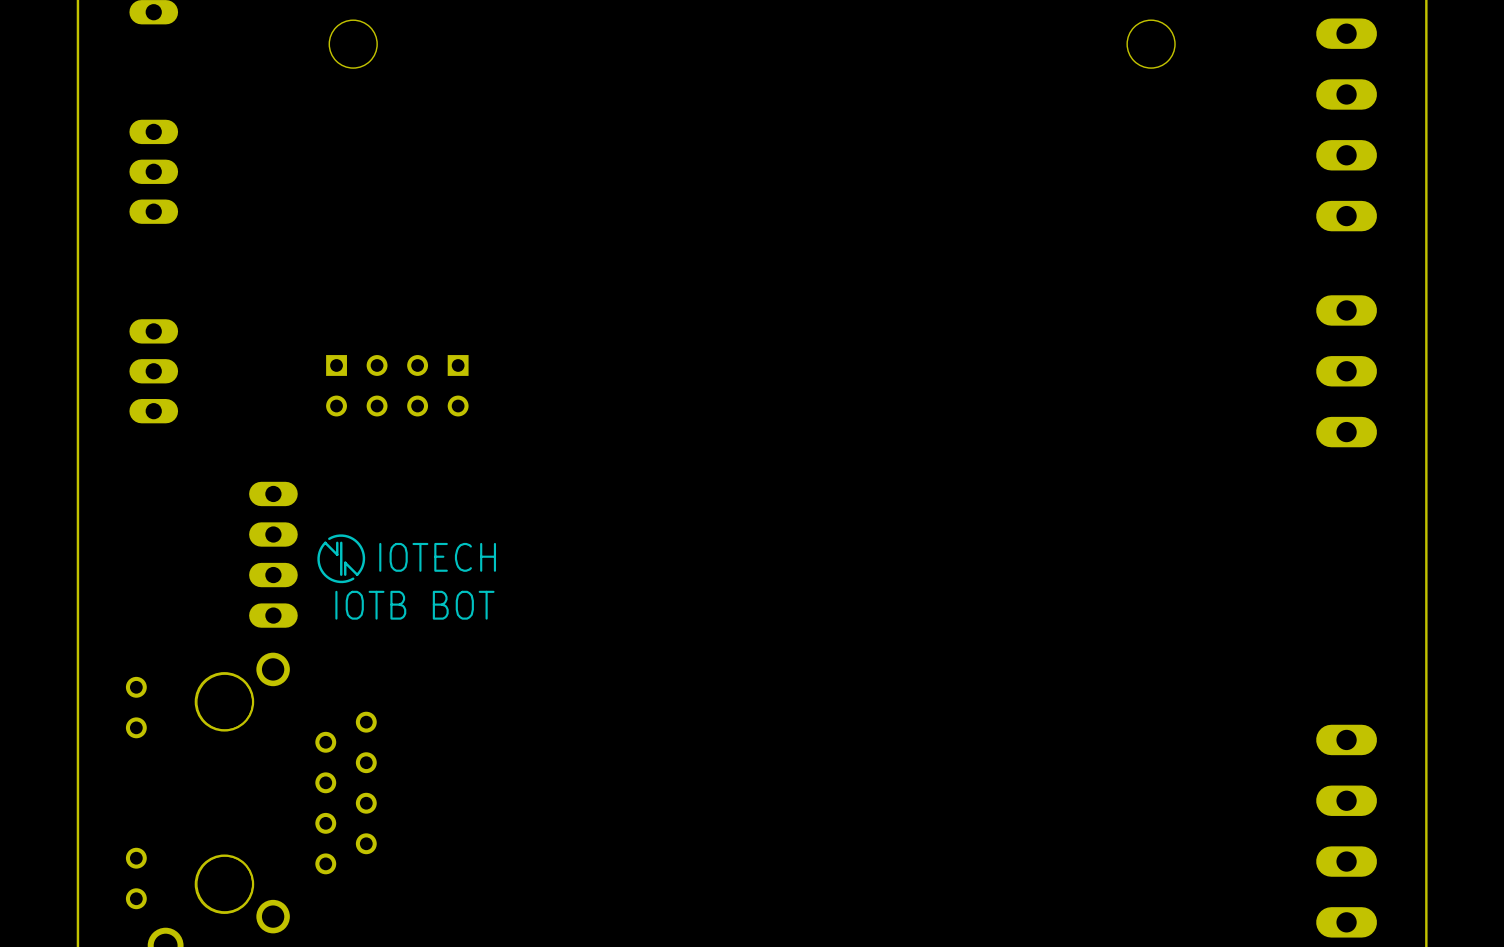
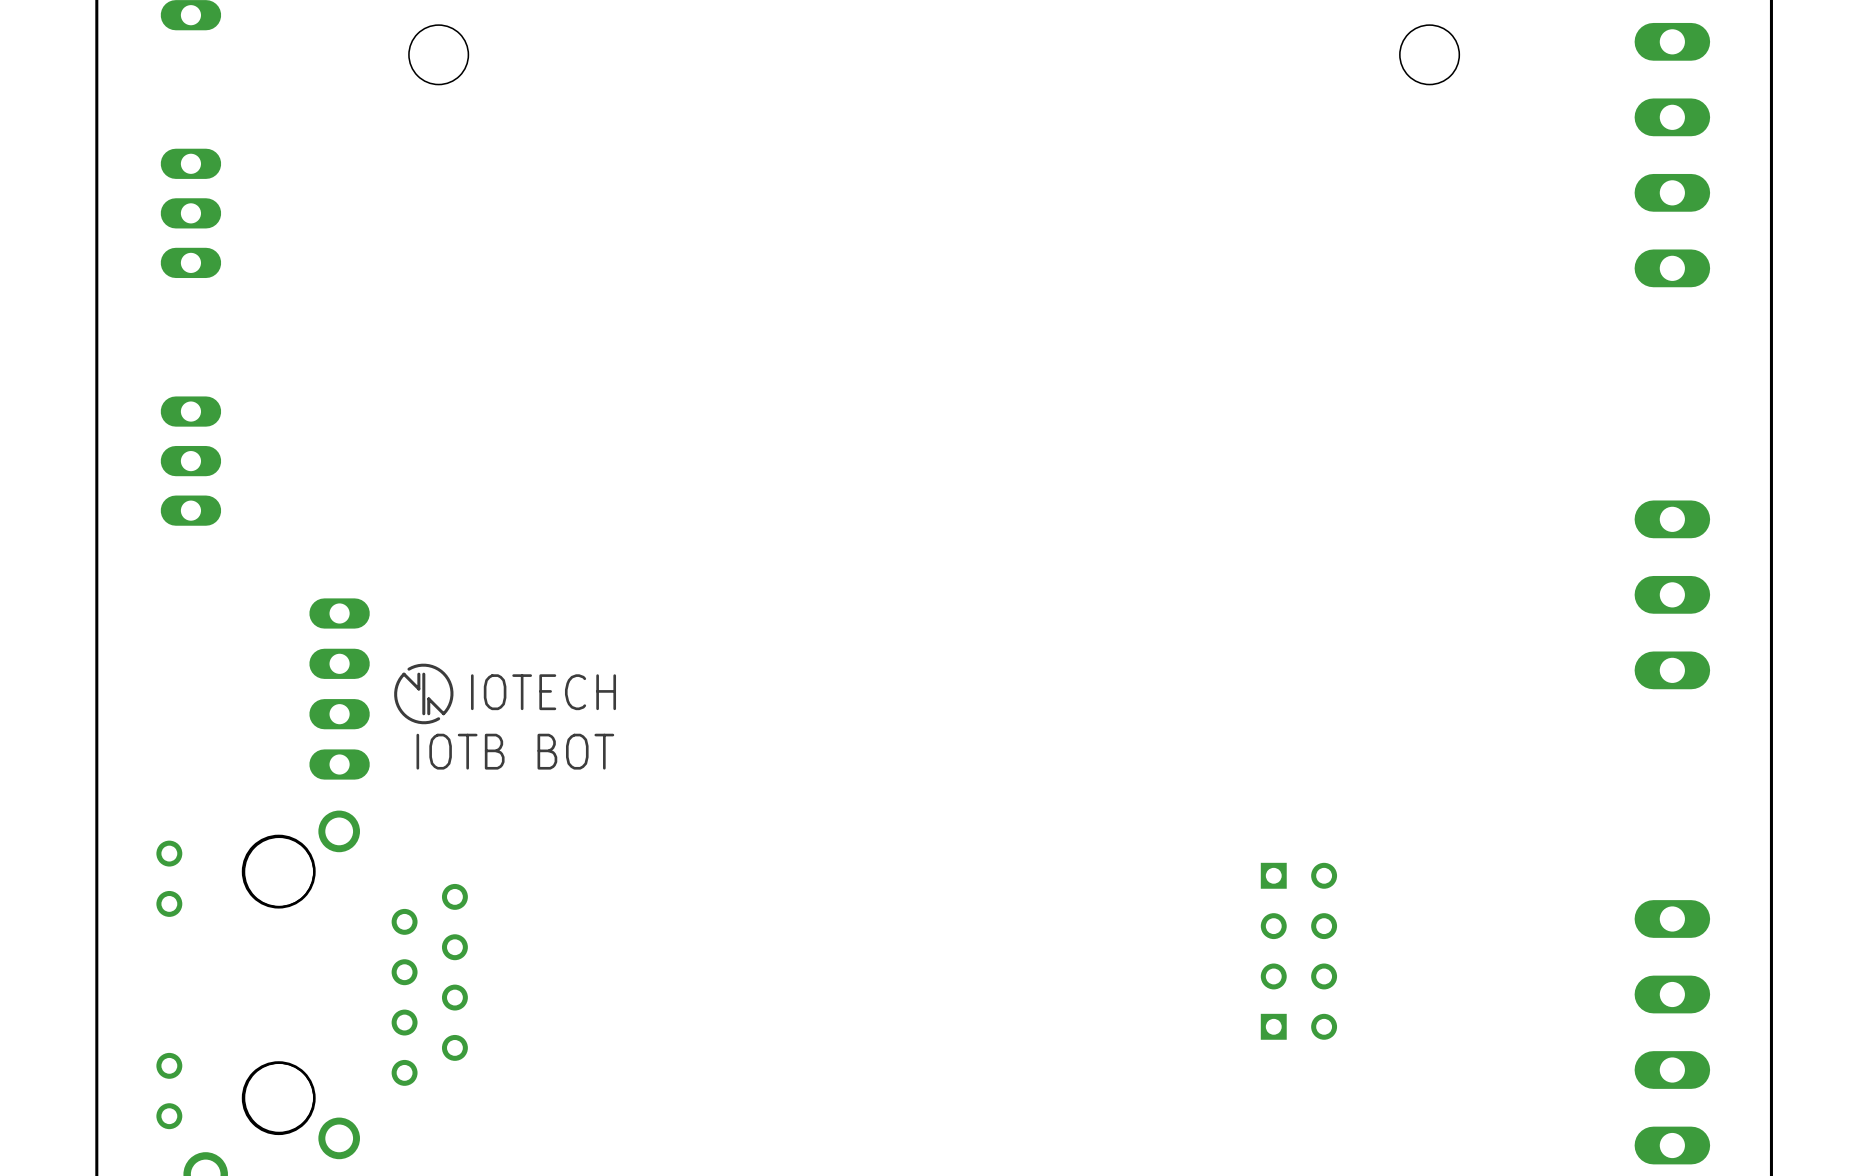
part position: (1346, 371) -> (1672, 594)
part: (397, 385) -> none
part: none -> (1298, 951)

